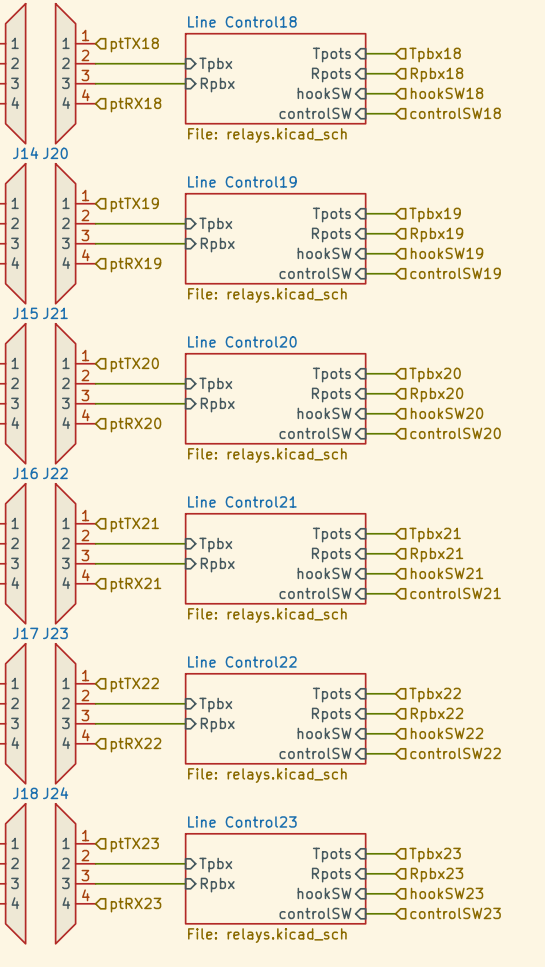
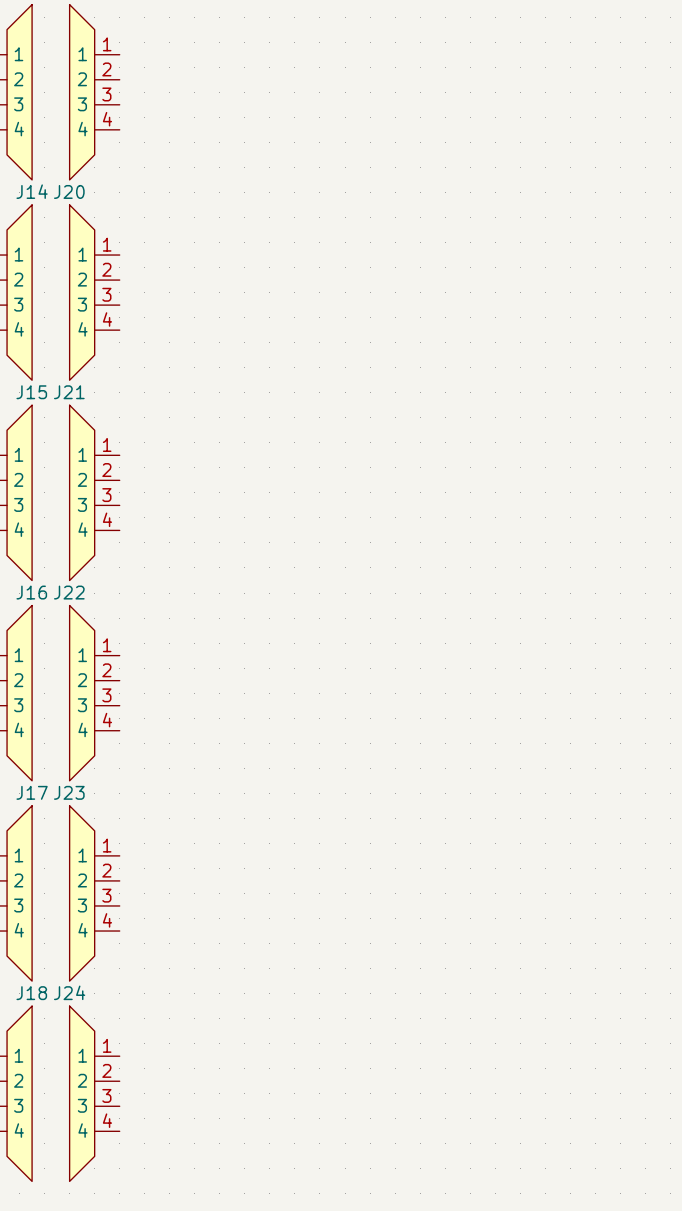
hierarchical label: ptTX18 (134, 45) -> none
wire: (365, 53) (395, 53) -> none
sheet pin: Tpots (331, 55) -> none
hierarchical label: Tpbx18 (435, 55) -> none
wire: (95, 63) (185, 63) -> none
sheet pin: Tpbx (215, 65) -> none
wire: (365, 73) (395, 73) -> none
sheet pin: Rpots (331, 75) -> none
hierarchical label: Rpbx18 (437, 75) -> none
sheet Line Control18: File: relays.kicad_sch (275, 78) -> none
wire: (95, 83) (185, 83) -> none
sheet pin: Rpbx (217, 85) -> none
sheet pin: hookSW (324, 93) -> none
wire: (365, 93) (395, 93) -> none
hierarchical label: hookSW18 (447, 93) -> none
hierarchical label: ptRX18 (136, 105) -> none
sheet pin: controlSW (315, 113) -> none
wire: (365, 113) (395, 113) -> none
hierarchical label: controlSW18 (455, 113) -> none
hierarchical label: ptTX19 (134, 205) -> none
wire: (365, 213) (395, 213) -> none
sheet pin: Tpots (331, 215) -> none
hierarchical label: Tpbx19 (435, 215) -> none
wire: (95, 223) (185, 223) -> none
sheet pin: Tpbx (215, 225) -> none
wire: (365, 233) (395, 233) -> none
sheet pin: Rpots (331, 235) -> none
hierarchical label: Rpbx19 (437, 235) -> none
sheet Line Control19: File: relays.kicad_sch (275, 238) -> none
wire: (95, 243) (185, 243) -> none
sheet pin: Rpbx (217, 245) -> none
sheet pin: hookSW (324, 253) -> none
wire: (365, 253) (395, 253) -> none
hierarchical label: hookSW19 (447, 253) -> none
hierarchical label: ptRX19 (136, 265) -> none
sheet pin: controlSW (315, 273) -> none
wire: (365, 273) (395, 273) -> none
hierarchical label: controlSW19 (455, 273) -> none
hierarchical label: ptTX20 (134, 365) -> none
wire: (365, 373) (395, 373) -> none
sheet pin: Tpots (331, 375) -> none
hierarchical label: Tpbx20 (435, 375) -> none
wire: (95, 383) (185, 383) -> none
sheet pin: Tpbx (215, 385) -> none
wire: (365, 393) (395, 393) -> none
sheet pin: Rpots (331, 395) -> none
hierarchical label: Rpbx20 (437, 395) -> none
sheet Line Control20: File: relays.kicad_sch (275, 398) -> none
wire: (95, 403) (185, 403) -> none
sheet pin: Rpbx (217, 405) -> none
sheet pin: hookSW (324, 413) -> none
wire: (365, 413) (395, 413) -> none
hierarchical label: hookSW20 (447, 413) -> none
hierarchical label: ptRX20 (136, 425) -> none
sheet pin: controlSW (315, 433) -> none
wire: (365, 433) (395, 433) -> none
hierarchical label: controlSW20 (455, 433) -> none
hierarchical label: ptTX21 (134, 525) -> none
wire: (365, 533) (395, 533) -> none
sheet pin: Tpots (331, 535) -> none
hierarchical label: Tpbx21 (435, 535) -> none
wire: (95, 543) (185, 543) -> none
sheet pin: Tpbx (215, 545) -> none
wire: (365, 553) (395, 553) -> none
sheet pin: Rpots (331, 555) -> none
hierarchical label: Rpbx21 (437, 555) -> none
sheet Line Control21: File: relays.kicad_sch (275, 558) -> none
wire: (95, 563) (185, 563) -> none
sheet pin: Rpbx (217, 565) -> none
sheet pin: hookSW (324, 573) -> none
wire: (365, 573) (395, 573) -> none
hierarchical label: hookSW21 (447, 573) -> none
hierarchical label: ptRX21 (136, 585) -> none
sheet pin: controlSW (315, 593) -> none
wire: (365, 593) (395, 593) -> none
hierarchical label: controlSW21 (455, 593) -> none
hierarchical label: ptTX22 (134, 685) -> none
wire: (365, 693) (395, 693) -> none
sheet pin: Tpots (331, 695) -> none
hierarchical label: Tpbx22 (435, 695) -> none
wire: (95, 703) (185, 703) -> none
sheet pin: Tpbx (215, 705) -> none
wire: (365, 713) (395, 713) -> none
sheet pin: Rpots (331, 715) -> none
hierarchical label: Rpbx22 (437, 715) -> none
sheet Line Control22: File: relays.kicad_sch (275, 718) -> none
wire: (95, 723) (185, 723) -> none
sheet pin: Rpbx (217, 725) -> none
sheet pin: hookSW (324, 733) -> none
wire: (365, 733) (395, 733) -> none
hierarchical label: hookSW22 (447, 733) -> none
hierarchical label: ptRX22 (136, 745) -> none
sheet pin: controlSW (315, 753) -> none
wire: (365, 753) (395, 753) -> none
hierarchical label: controlSW22 (455, 753) -> none
hierarchical label: ptTX23 (134, 845) -> none
wire: (365, 853) (395, 853) -> none
sheet pin: Tpots (331, 855) -> none
hierarchical label: Tpbx23 (435, 855) -> none
wire: (95, 863) (185, 863) -> none
sheet pin: Tpbx (215, 865) -> none
wire: (365, 873) (395, 873) -> none
sheet pin: Rpots (331, 875) -> none
hierarchical label: Rpbx23 (437, 875) -> none
sheet Line Control23: File: relays.kicad_sch (275, 878) -> none
wire: (95, 883) (185, 883) -> none
sheet pin: Rpbx (217, 885) -> none
sheet pin: hookSW (324, 893) -> none
wire: (365, 893) (395, 893) -> none
hierarchical label: hookSW23 (447, 893) -> none
hierarchical label: ptRX23 (136, 905) -> none
sheet pin: controlSW (315, 913) -> none
wire: (365, 913) (395, 913) -> none
hierarchical label: controlSW23 (455, 913) -> none

